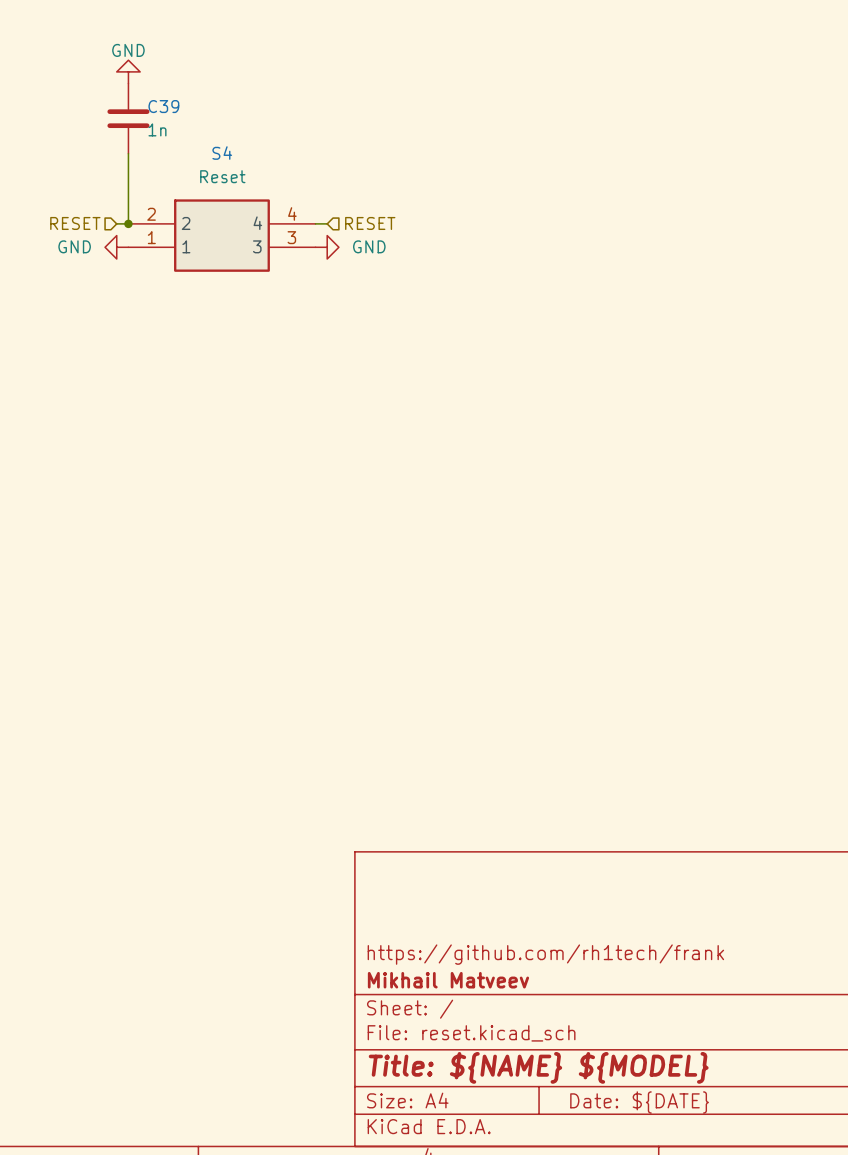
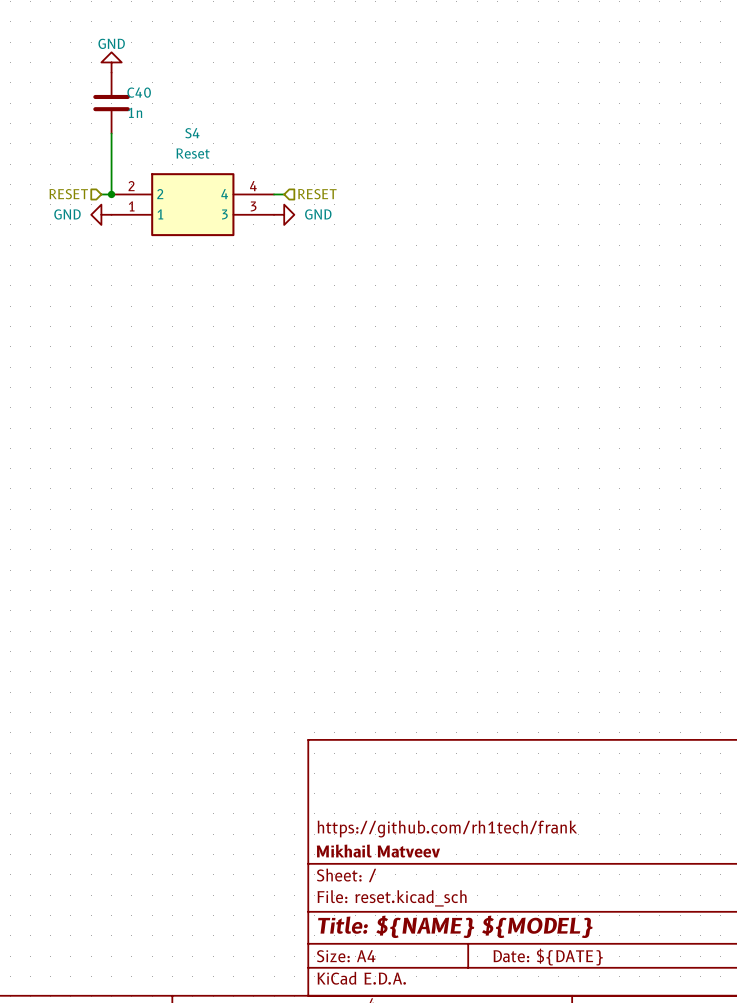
C39 name: C39 (163, 106) -> C40 (139, 92)

